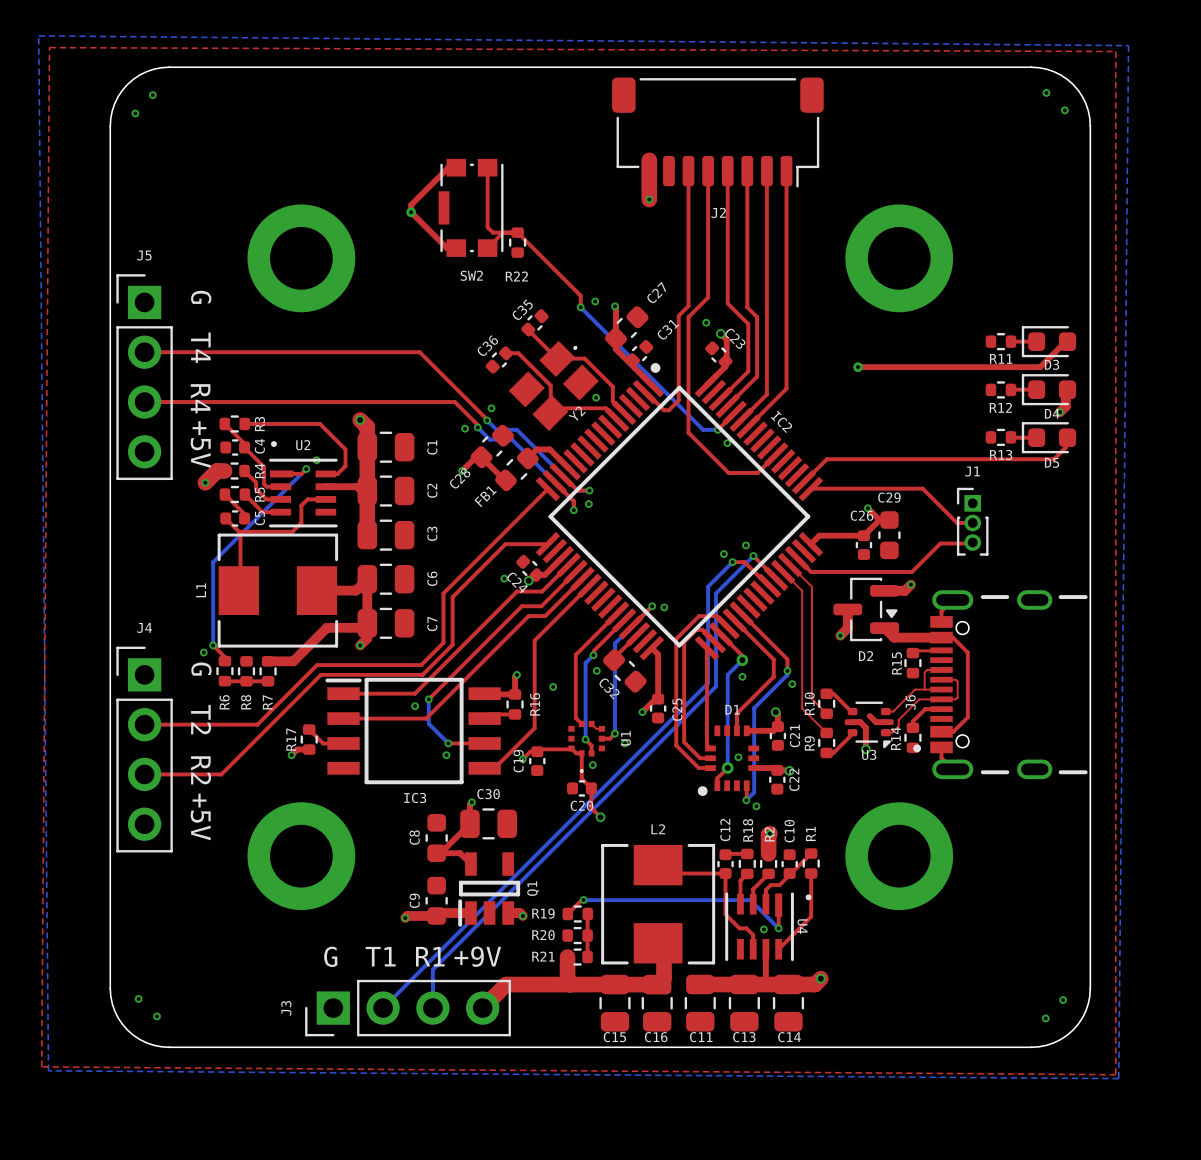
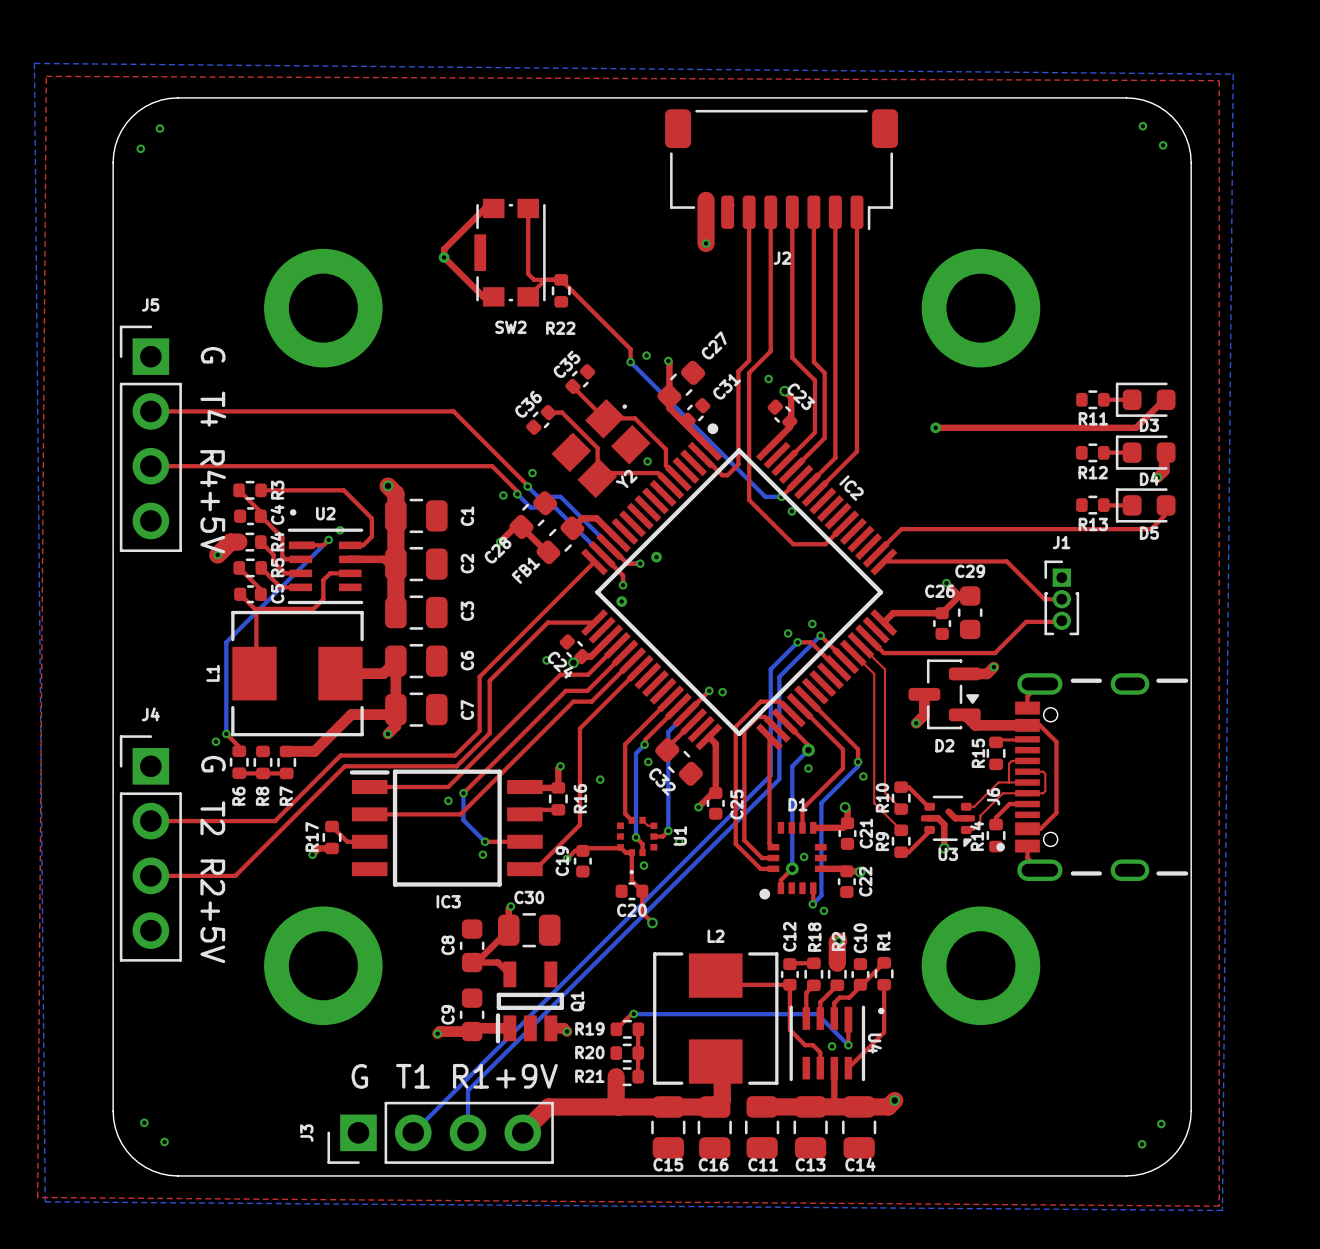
via: none -> (656, 557)
via: (588, 504) -> none
via: none -> (621, 601)

